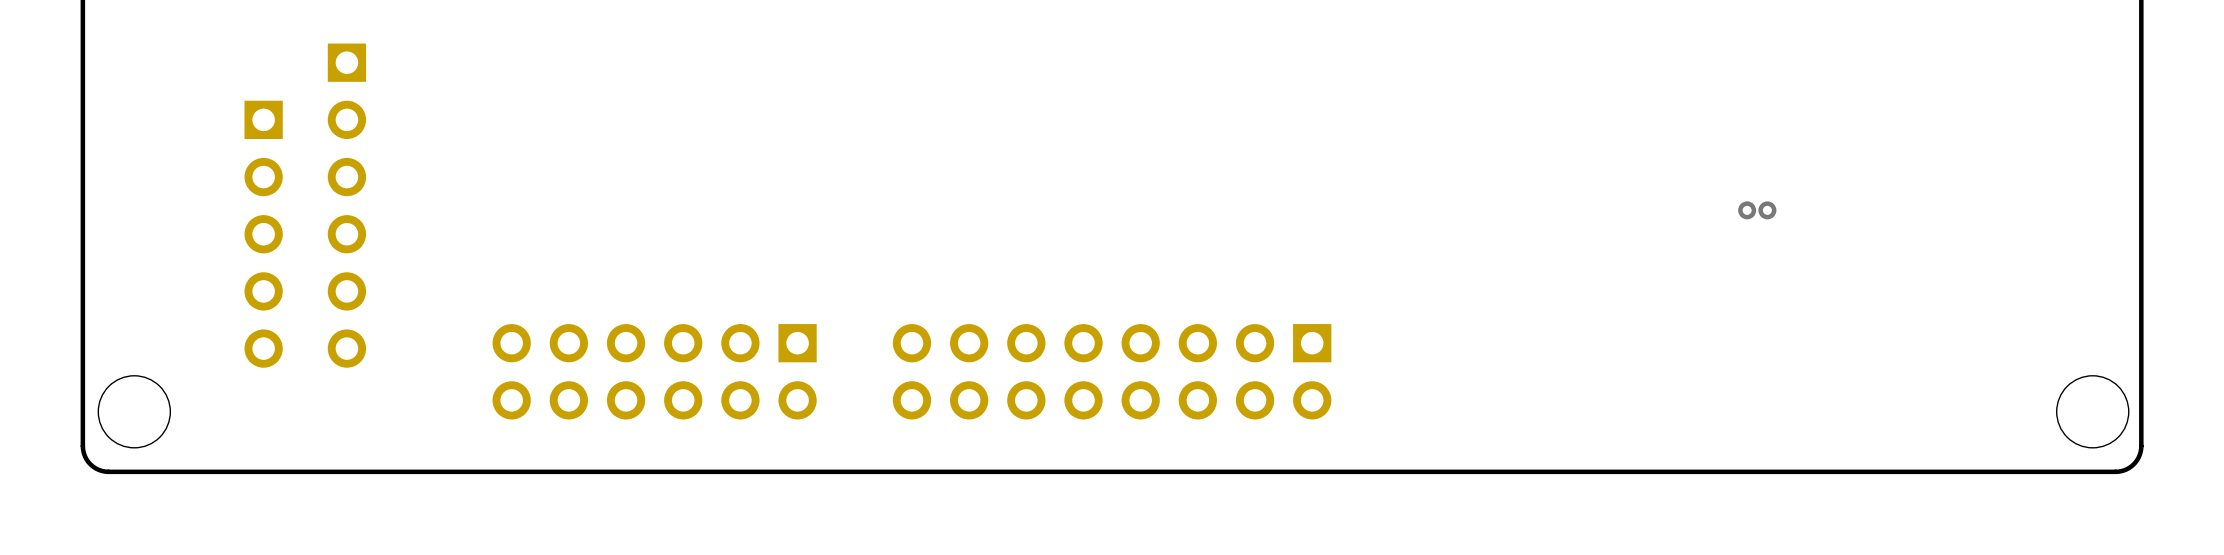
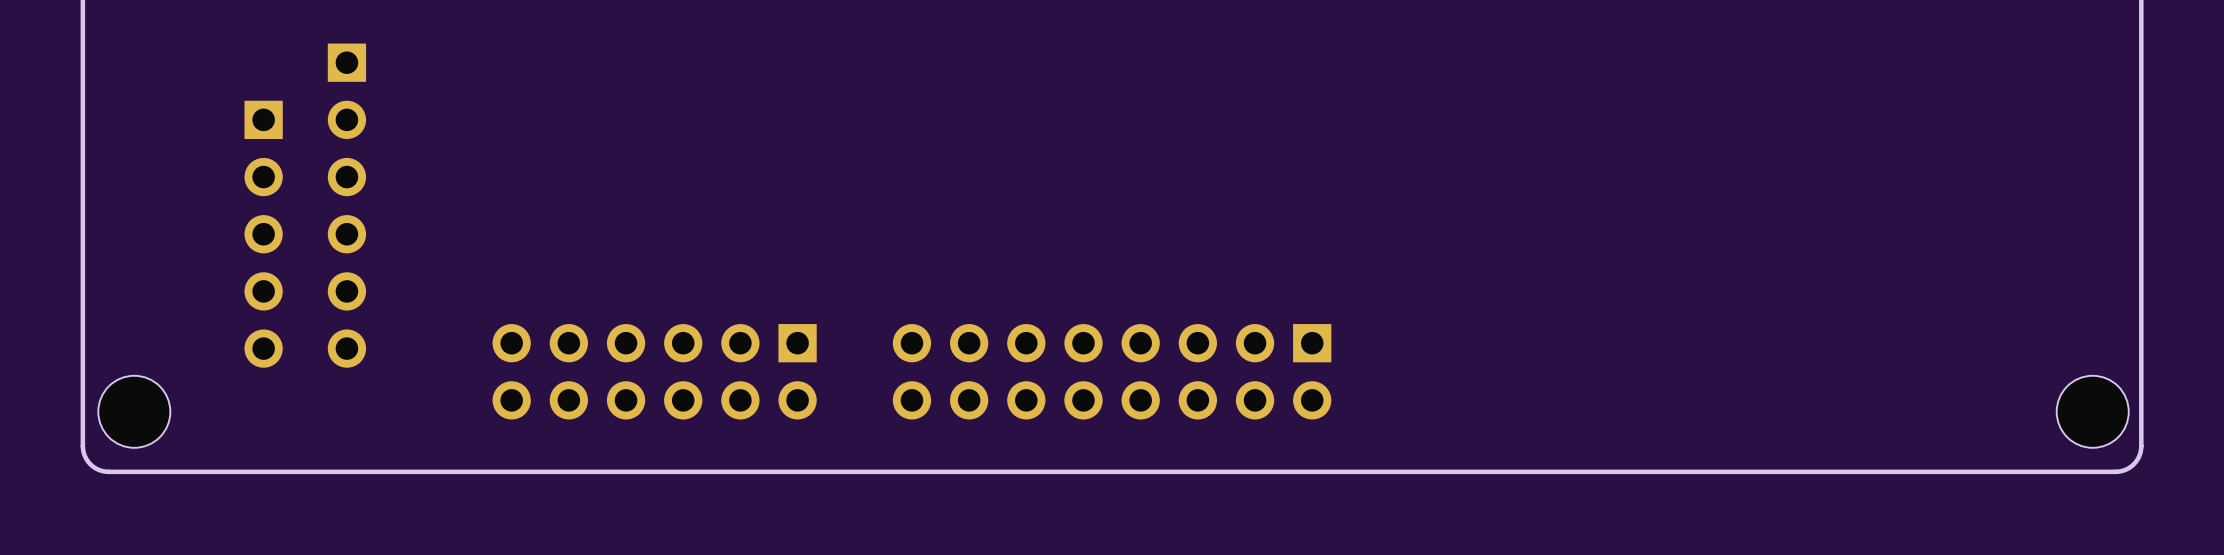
via: (1747, 210) -> none
via: (1767, 210) -> none

